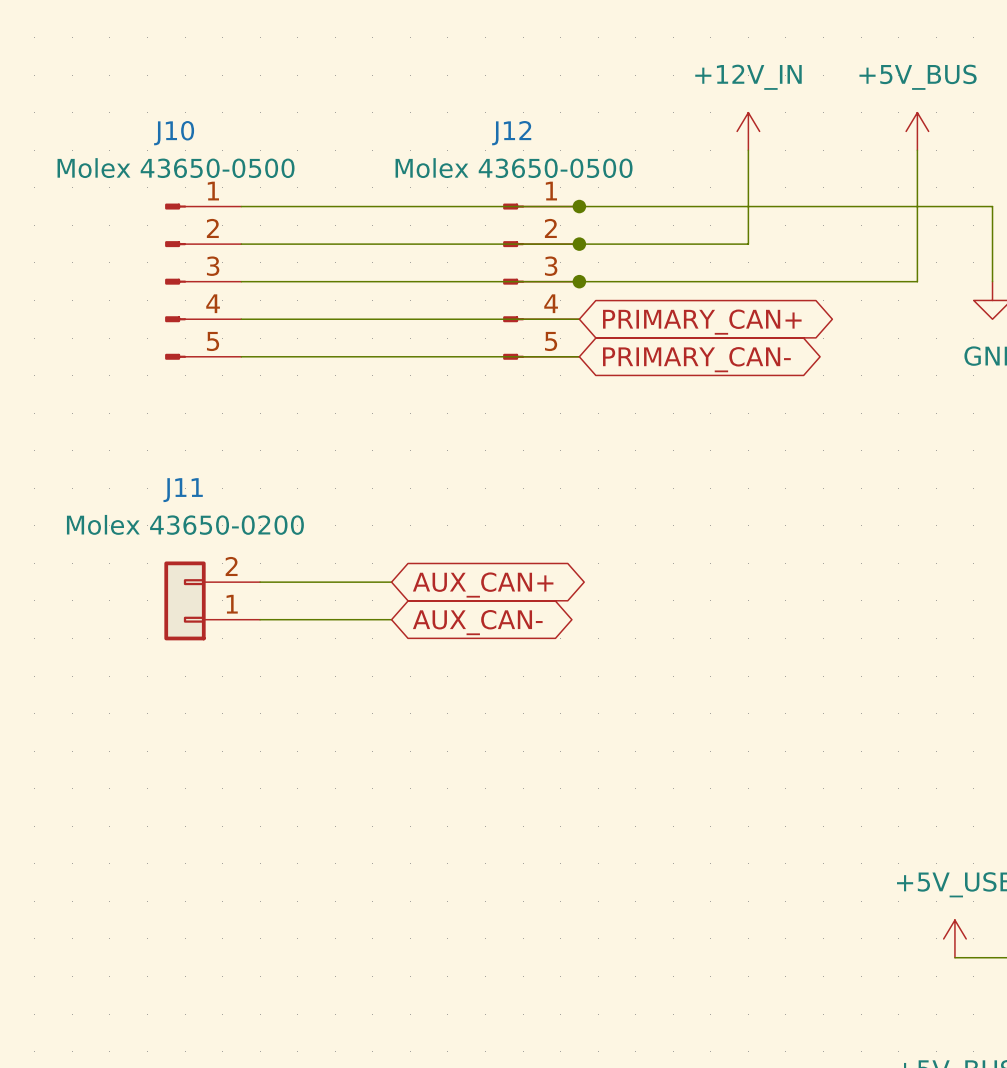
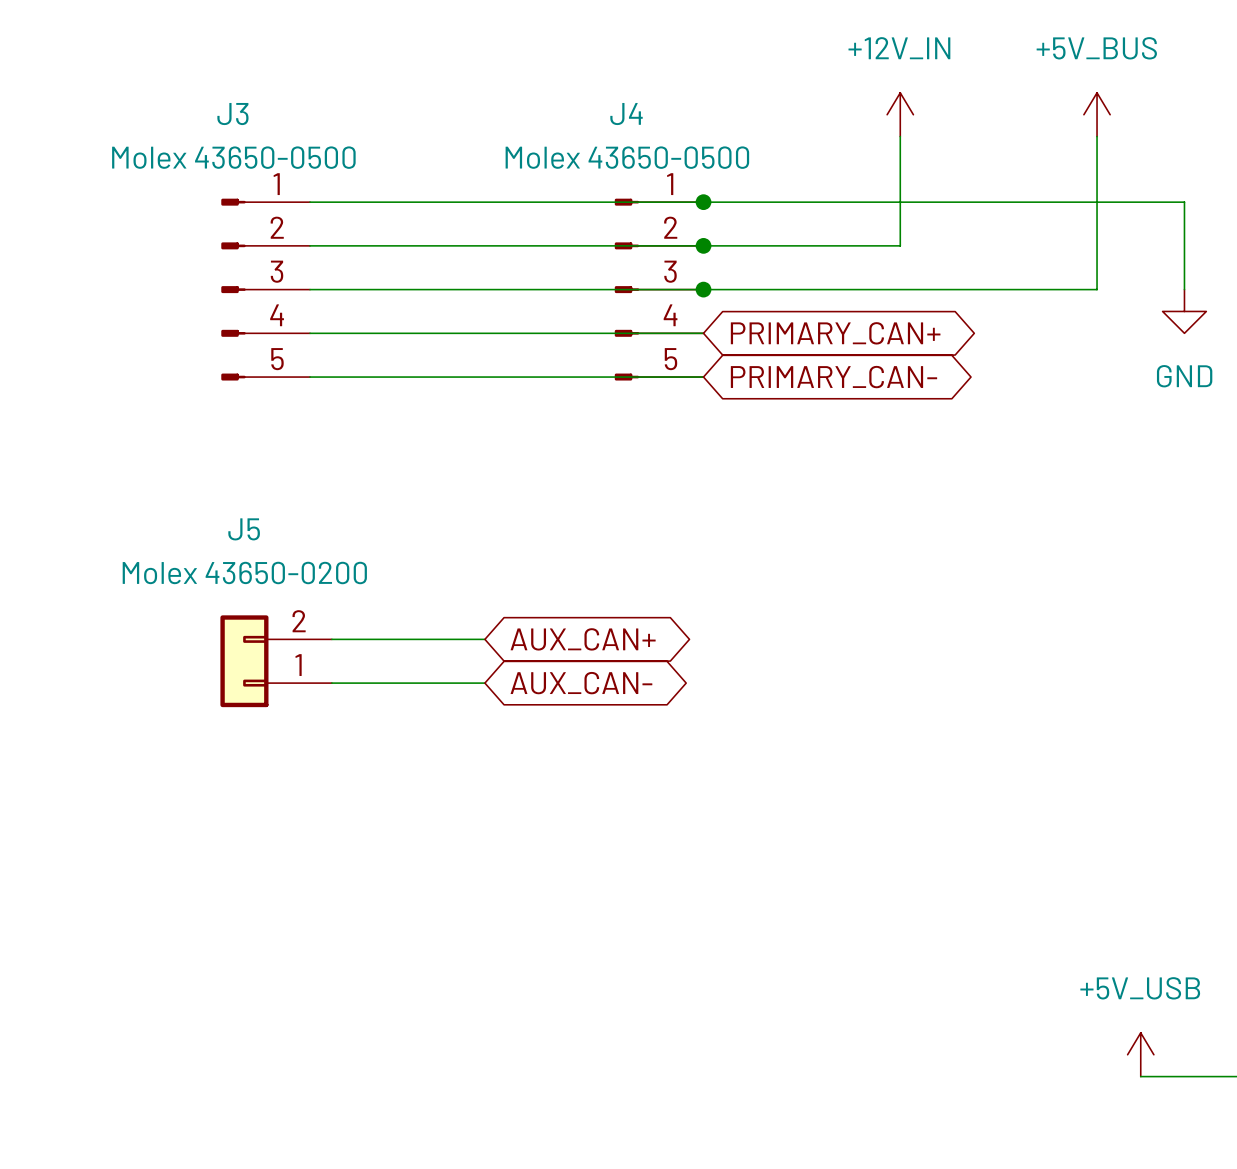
J10 name: J10 (174, 133) -> J3 (232, 114)
J12 name: J12 (511, 133) -> J4 (626, 114)
J11 name: J11 (183, 490) -> J5 (244, 529)

